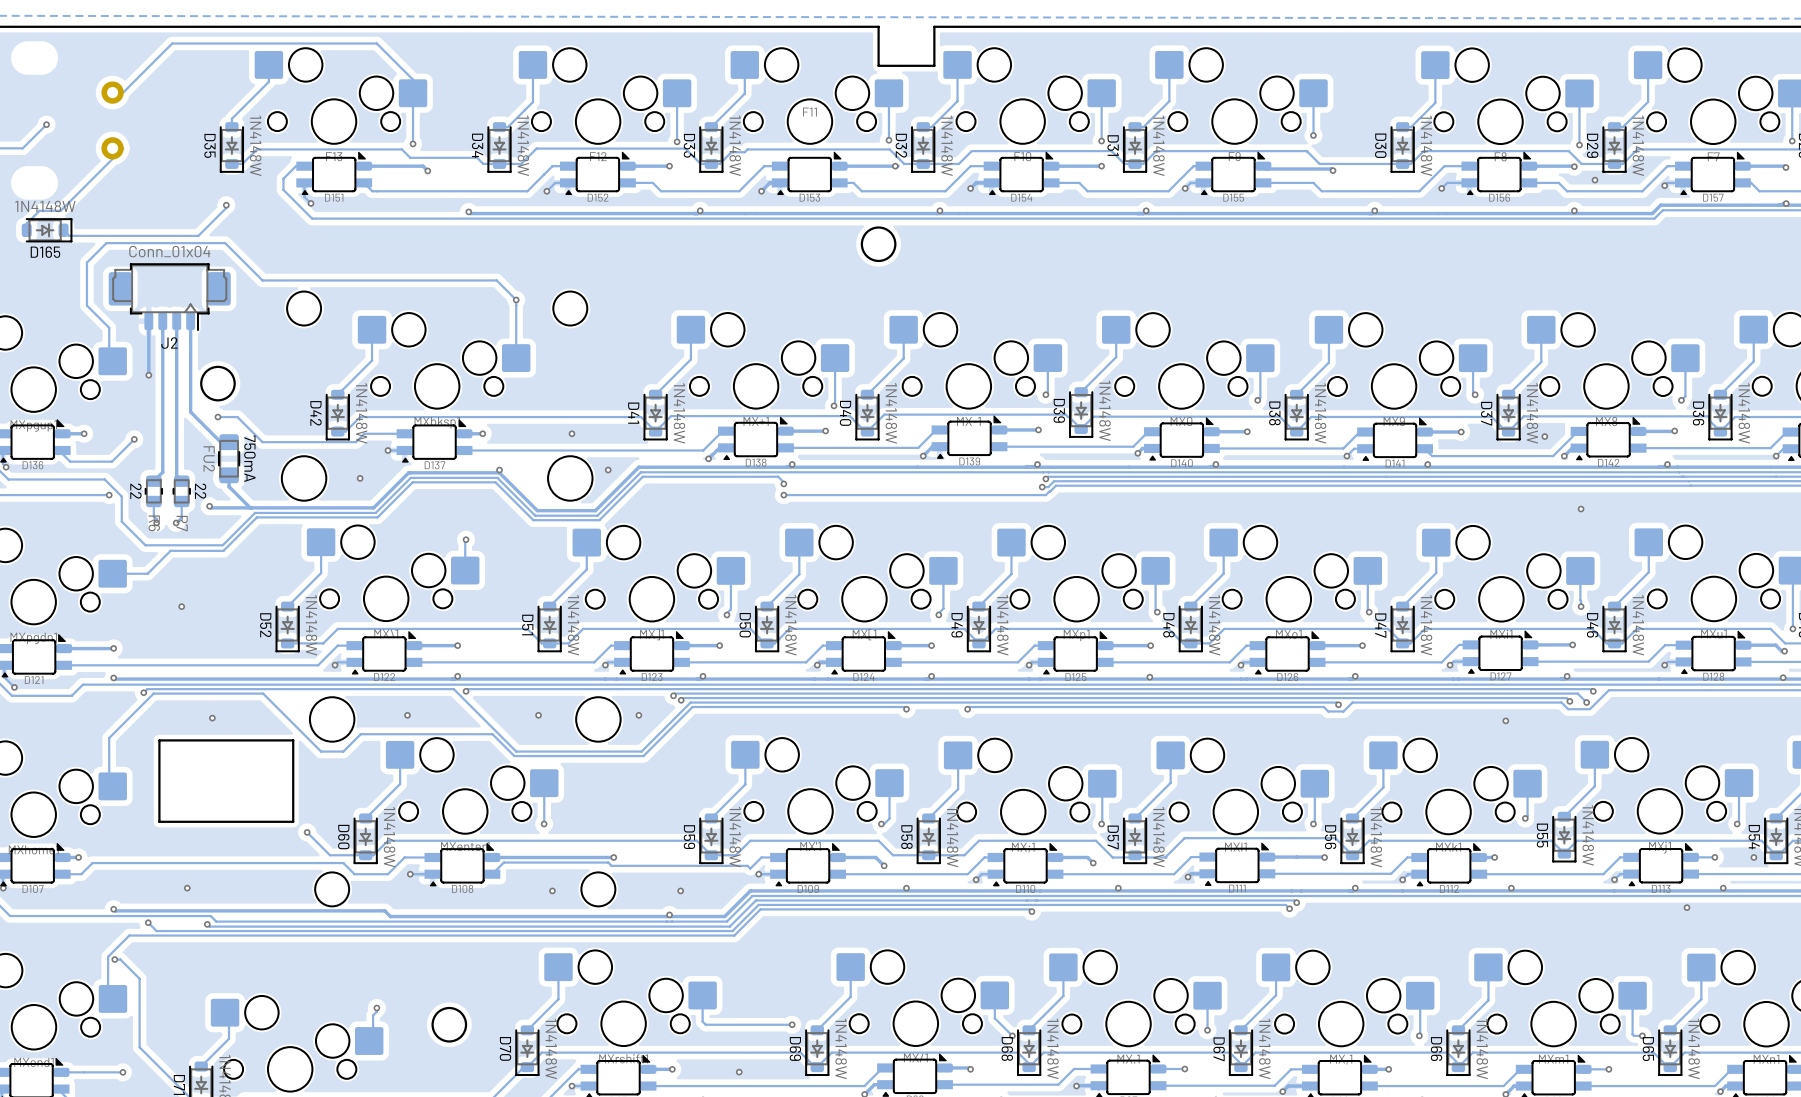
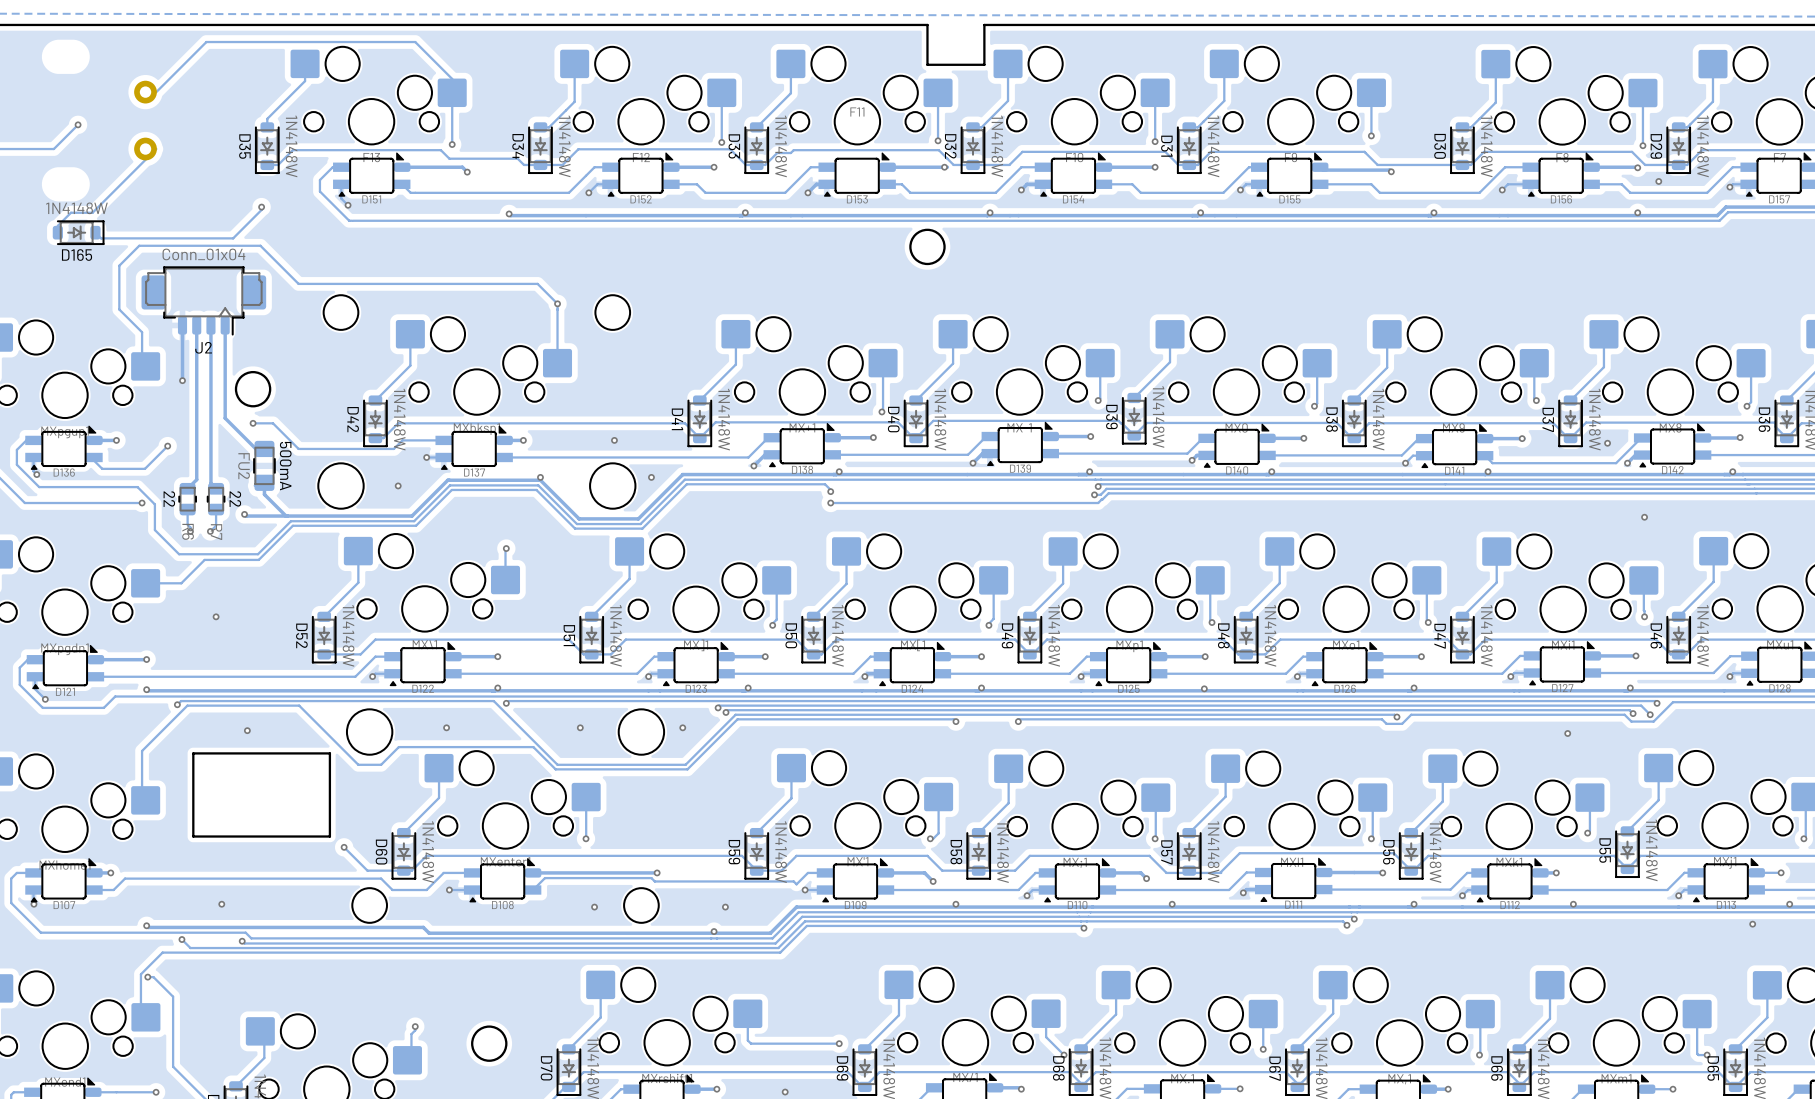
FU2 value: 750mA (249, 458) -> 500mA (285, 466)

